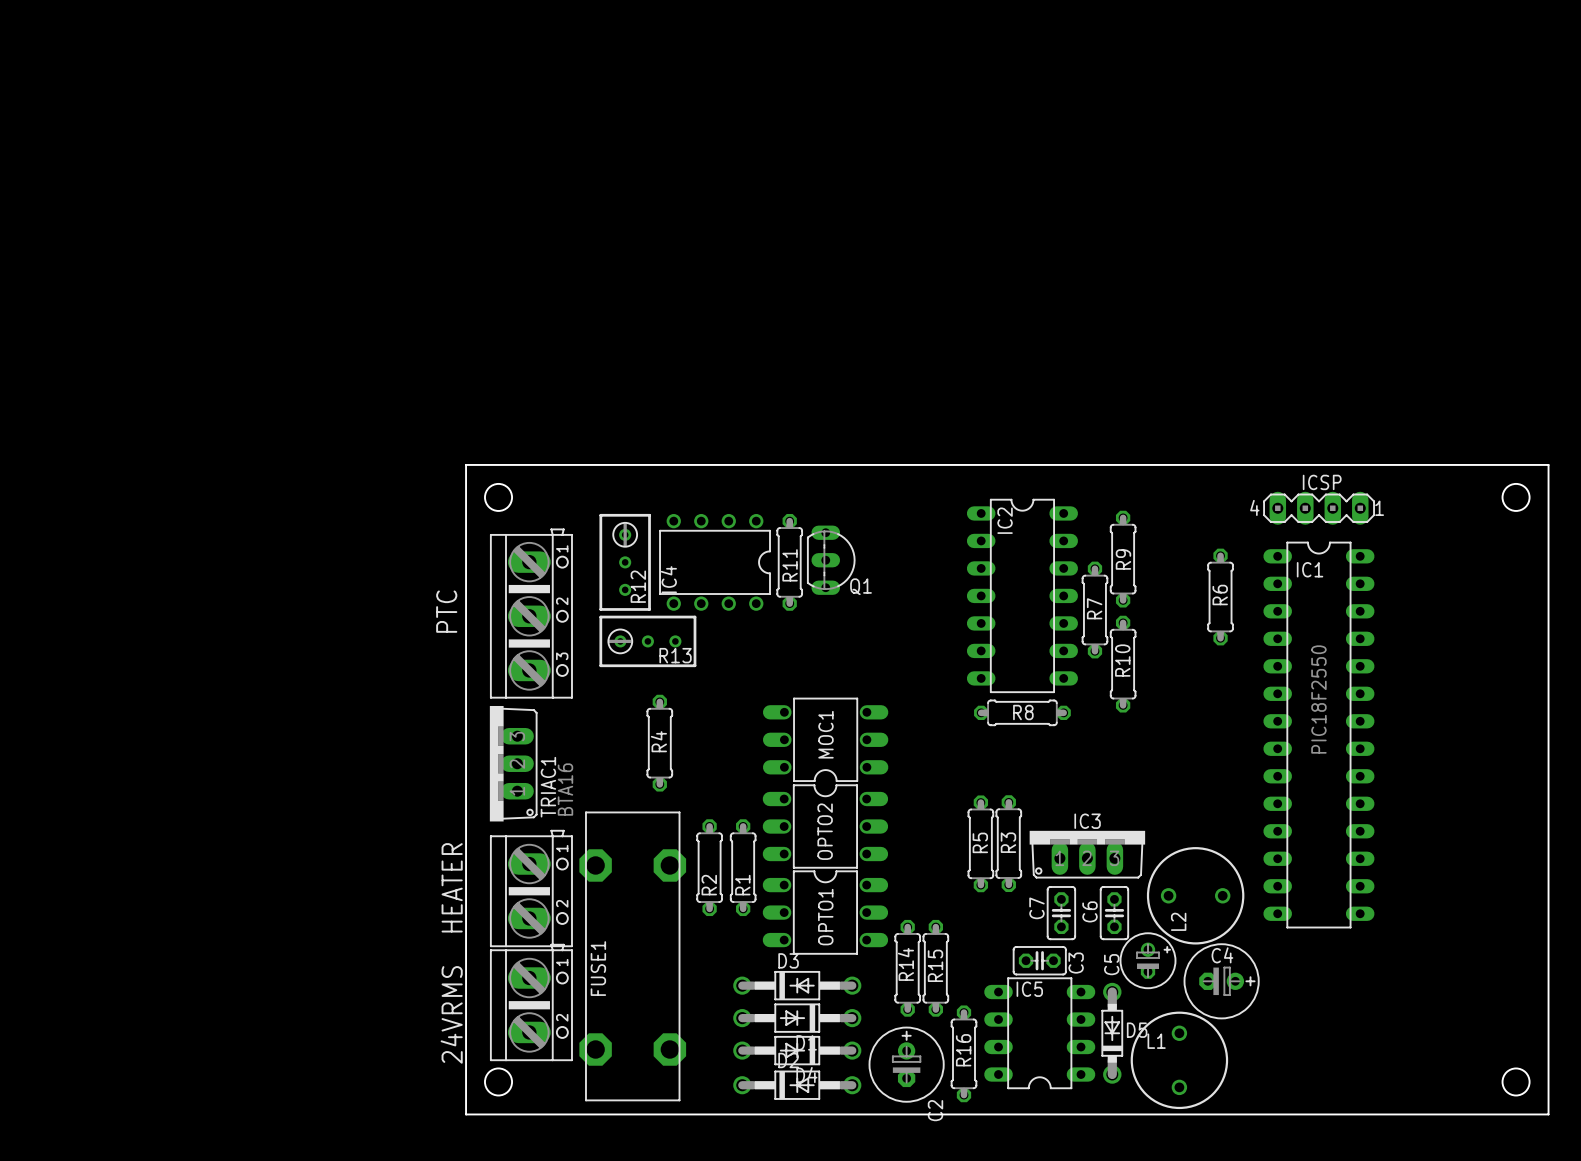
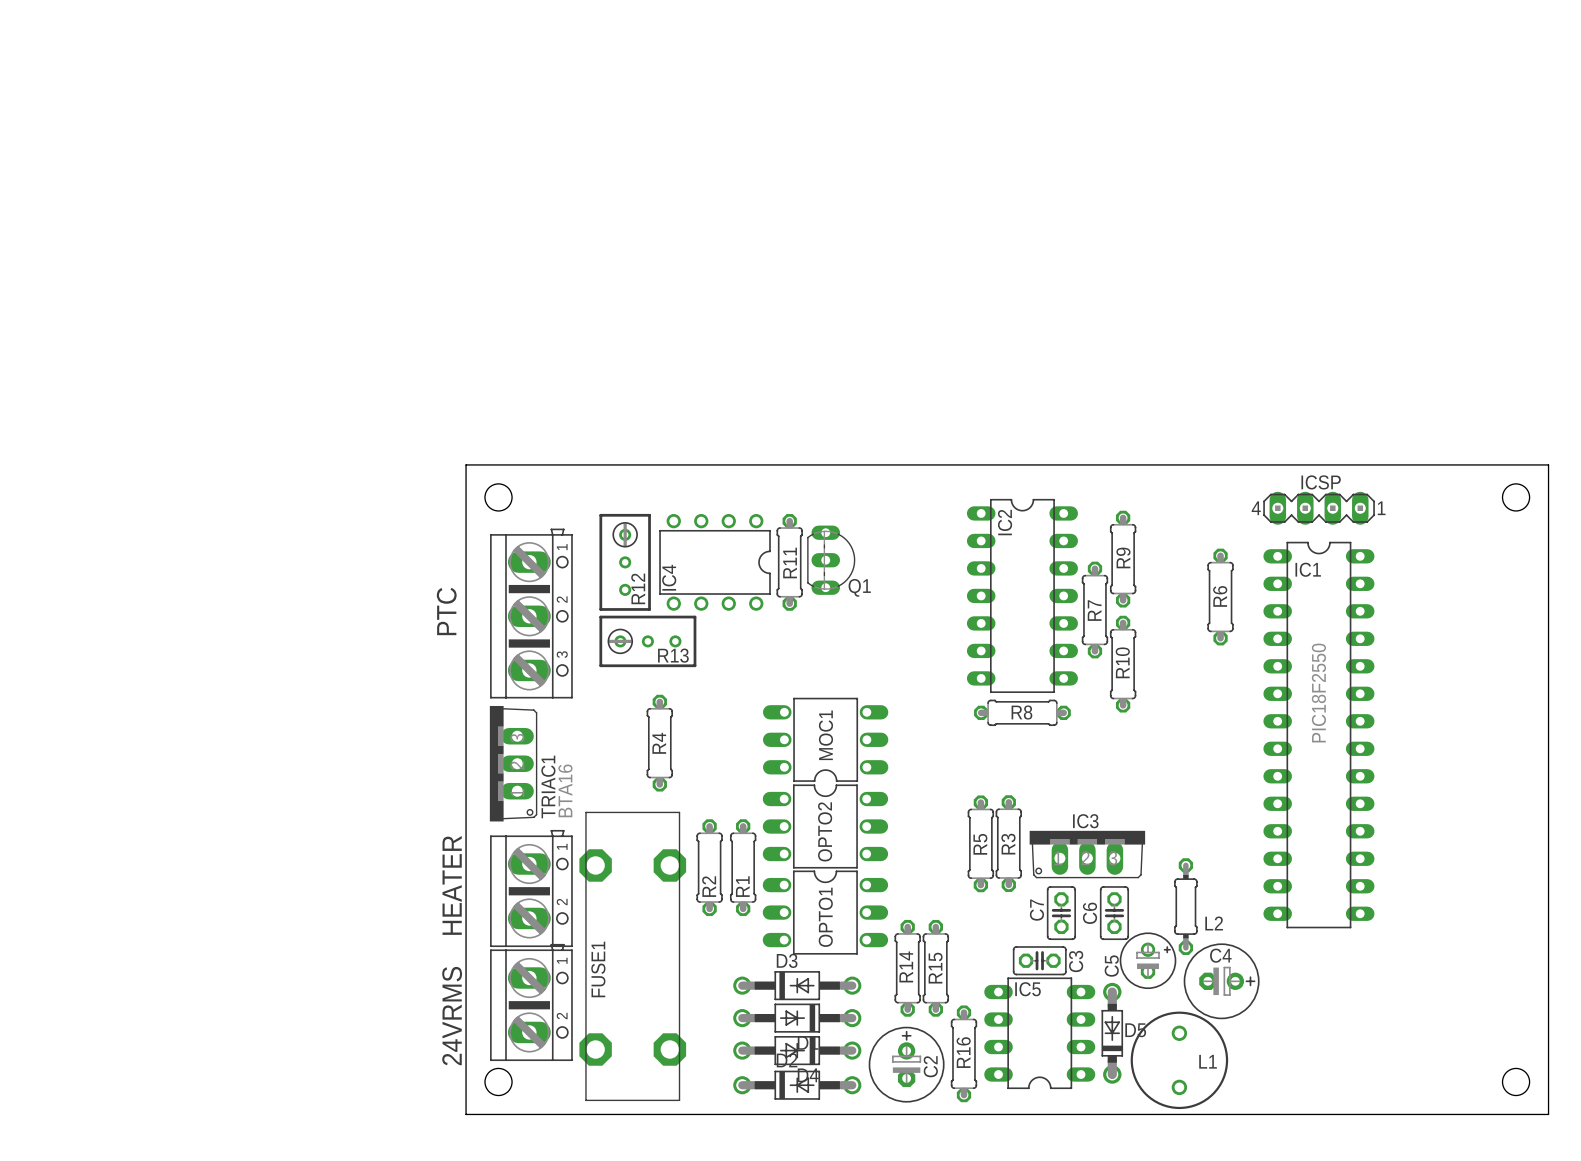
L2 footprint: [1146, 847, 1245, 945] -> [1174, 858, 1198, 956]
L2 name position: L2 (1178, 921) -> L2 (1214, 923)
L1 name position: L1 (1156, 1041) -> L1 (1208, 1061)
C2 name position: C2 (935, 1110) -> C2 (930, 1066)

